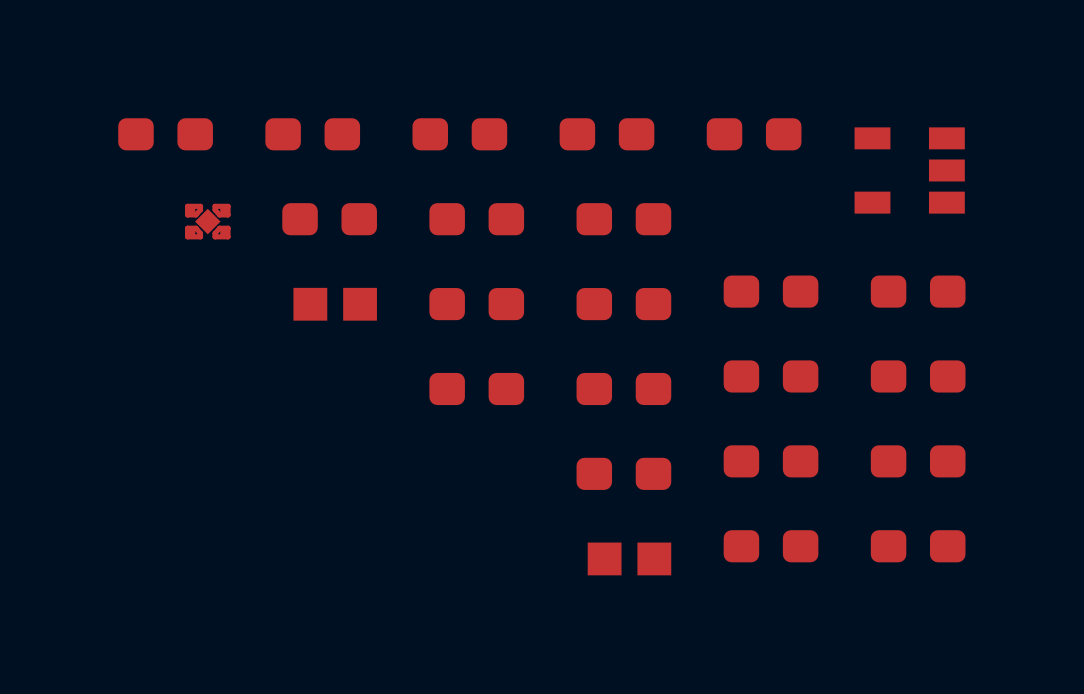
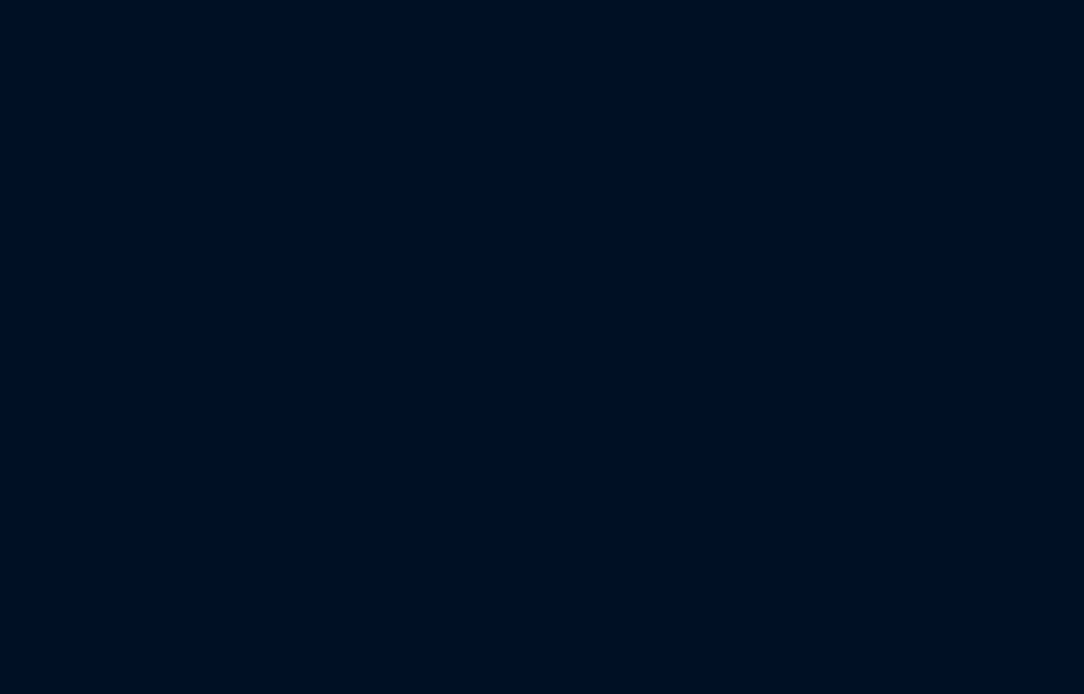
part: (165, 134) -> none
part: (312, 134) -> none
part: (459, 134) -> none
part: (606, 134) -> none
part: (754, 134) -> none
part: (909, 170) -> none
part: (329, 219) -> none
part: (476, 219) -> none
part: (623, 219) -> none
part: (207, 221) -> none
part: (771, 291) -> none
part: (918, 291) -> none
part: (335, 304) -> none
part: (476, 304) -> none
part: (623, 304) -> none
part: (771, 376) -> none
part: (918, 376) -> none
part: (476, 388) -> none
part: (623, 388) -> none
part: (771, 461) -> none
part: (918, 461) -> none
part: (623, 473) -> none
part: (771, 546) -> none
part: (918, 546) -> none
part: (629, 558) -> none

